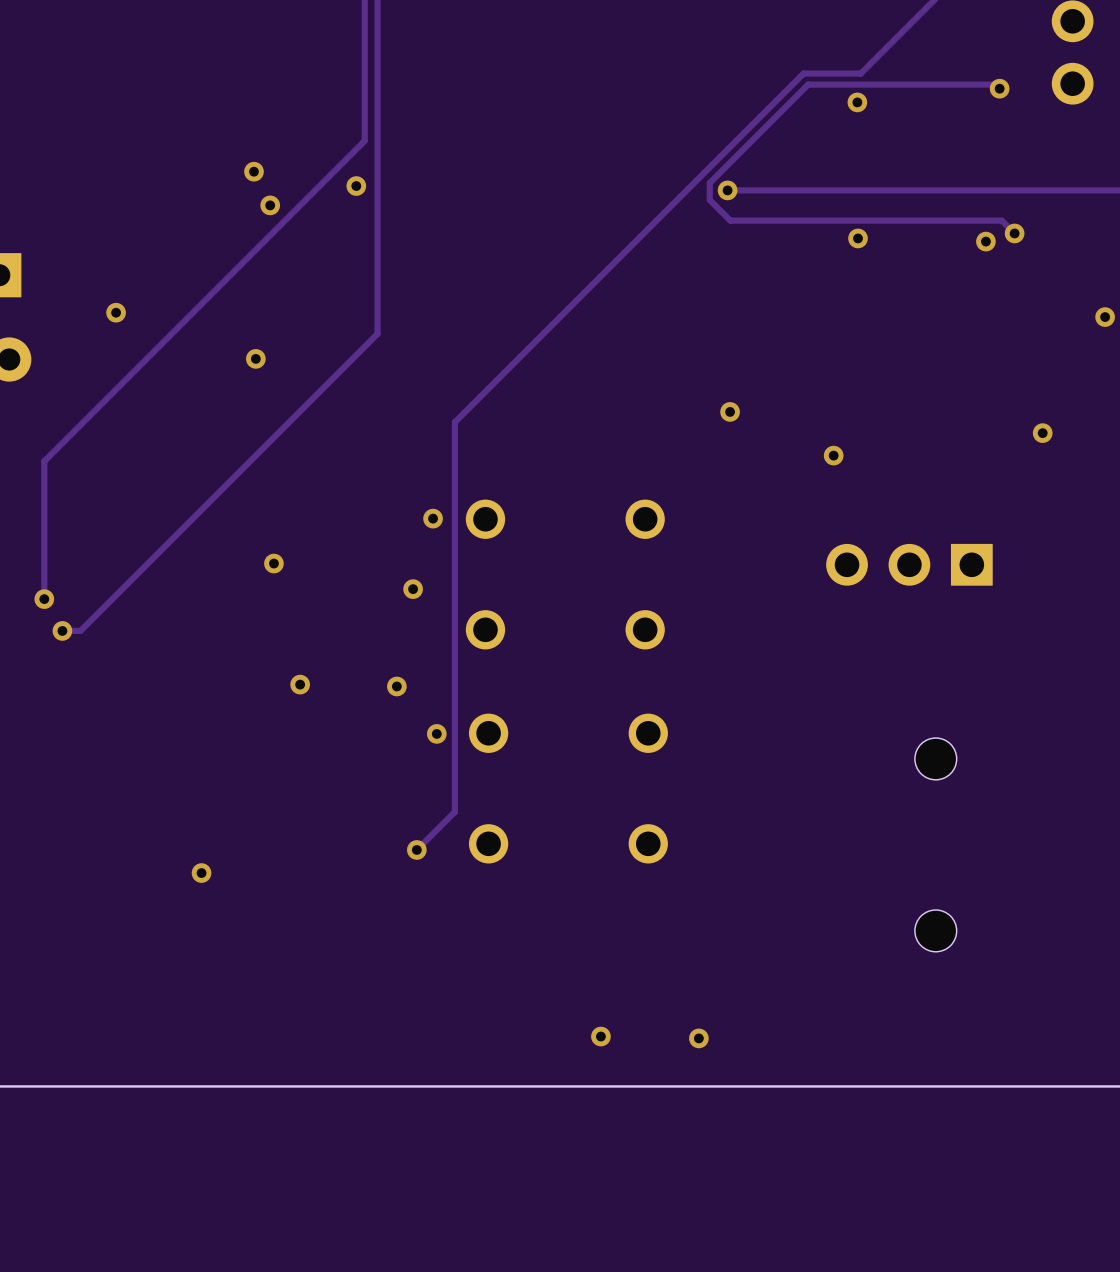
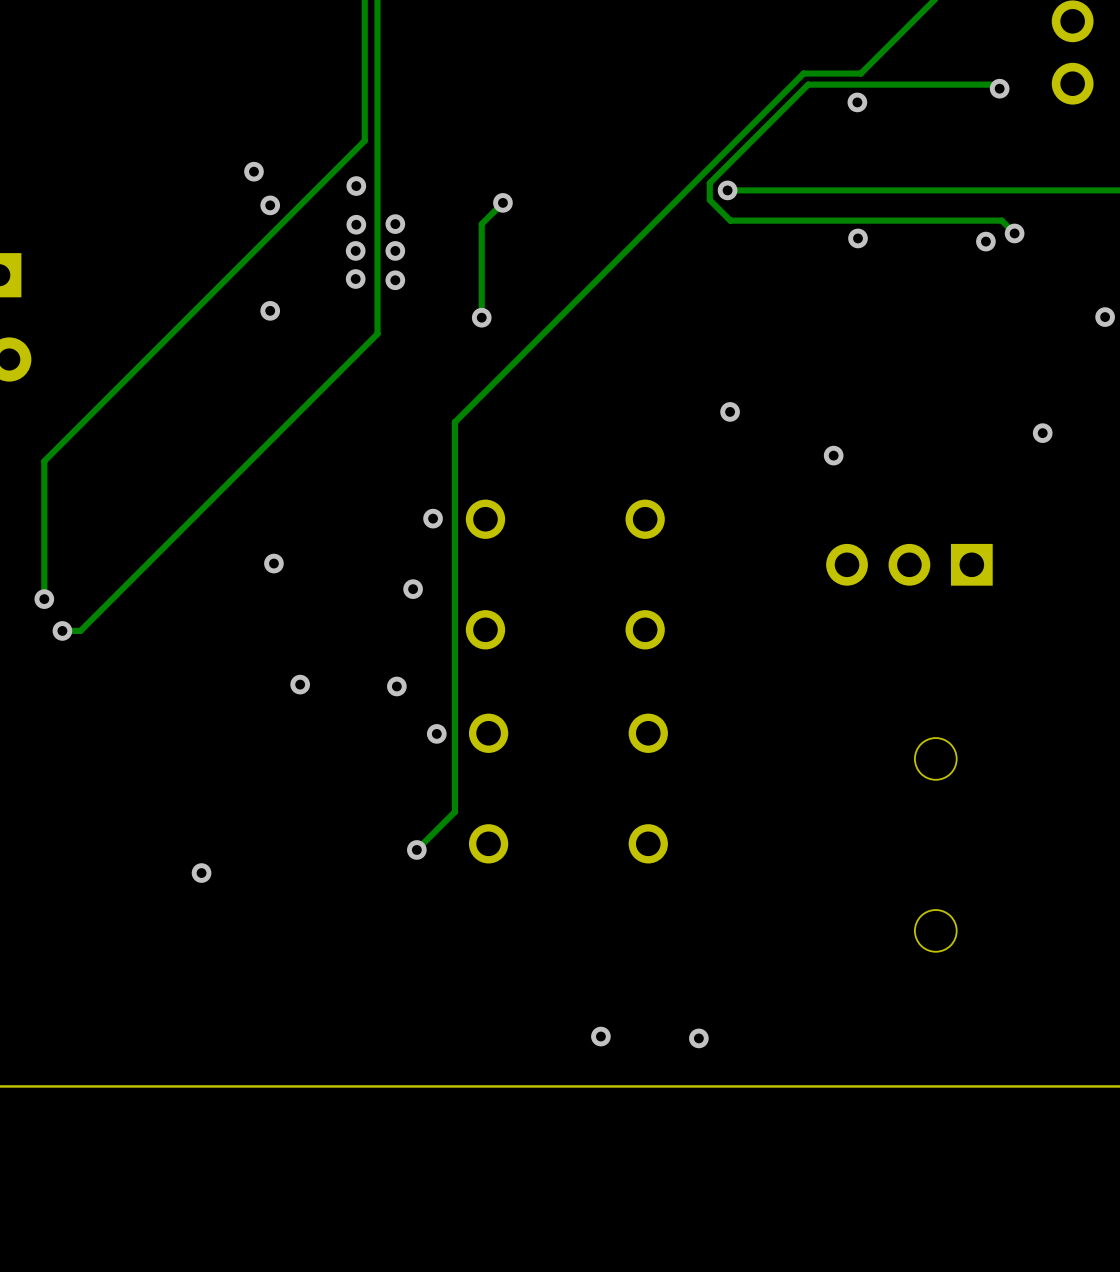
track: none -> (502, 202) (481, 224) (481, 317)
via: none -> (502, 202)
via: none -> (356, 224)
via: none -> (395, 224)
via: none -> (355, 250)
via: none -> (395, 250)
via: none -> (355, 279)
via: none -> (395, 280)
via: (116, 312) -> none
via: none -> (481, 317)
via position: (255, 358) -> (270, 310)

